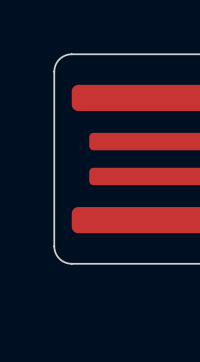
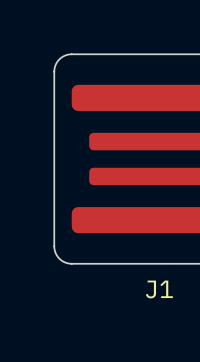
J1 name: none -> J1 (159, 289)

